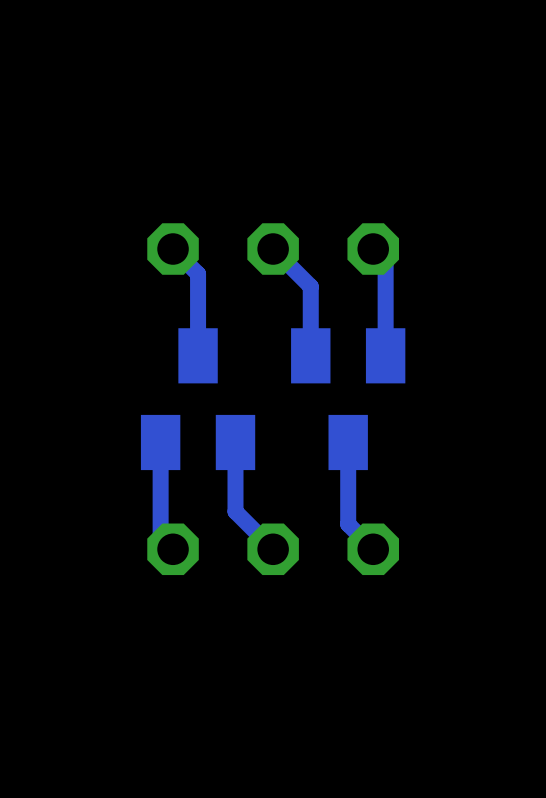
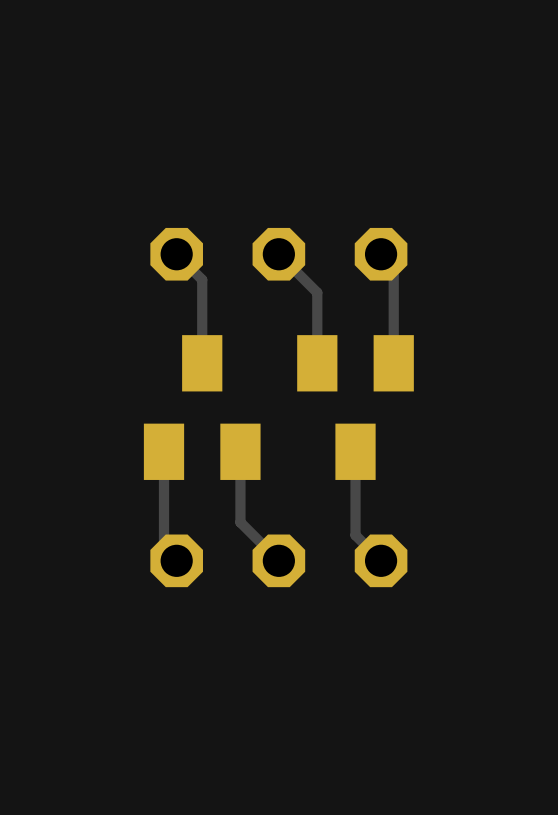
track width: thick (173, 249) (198, 274) (198, 355) -> thin (176, 254) (202, 279) (202, 363)
track width: thick (273, 249) (310, 286) (310, 355) -> thin (278, 254) (317, 292) (317, 363)
track width: thick (373, 249) (385, 261) (385, 355) -> thin (381, 254) (393, 266) (393, 363)
track width: thick (160, 442) (160, 536) (173, 549) -> thin (164, 451) (164, 548) (176, 560)
track width: thick (235, 442) (235, 511) (273, 549) -> thin (240, 451) (240, 522) (278, 560)
track width: thick (348, 442) (348, 524) (373, 549) -> thin (355, 451) (355, 535) (381, 560)

